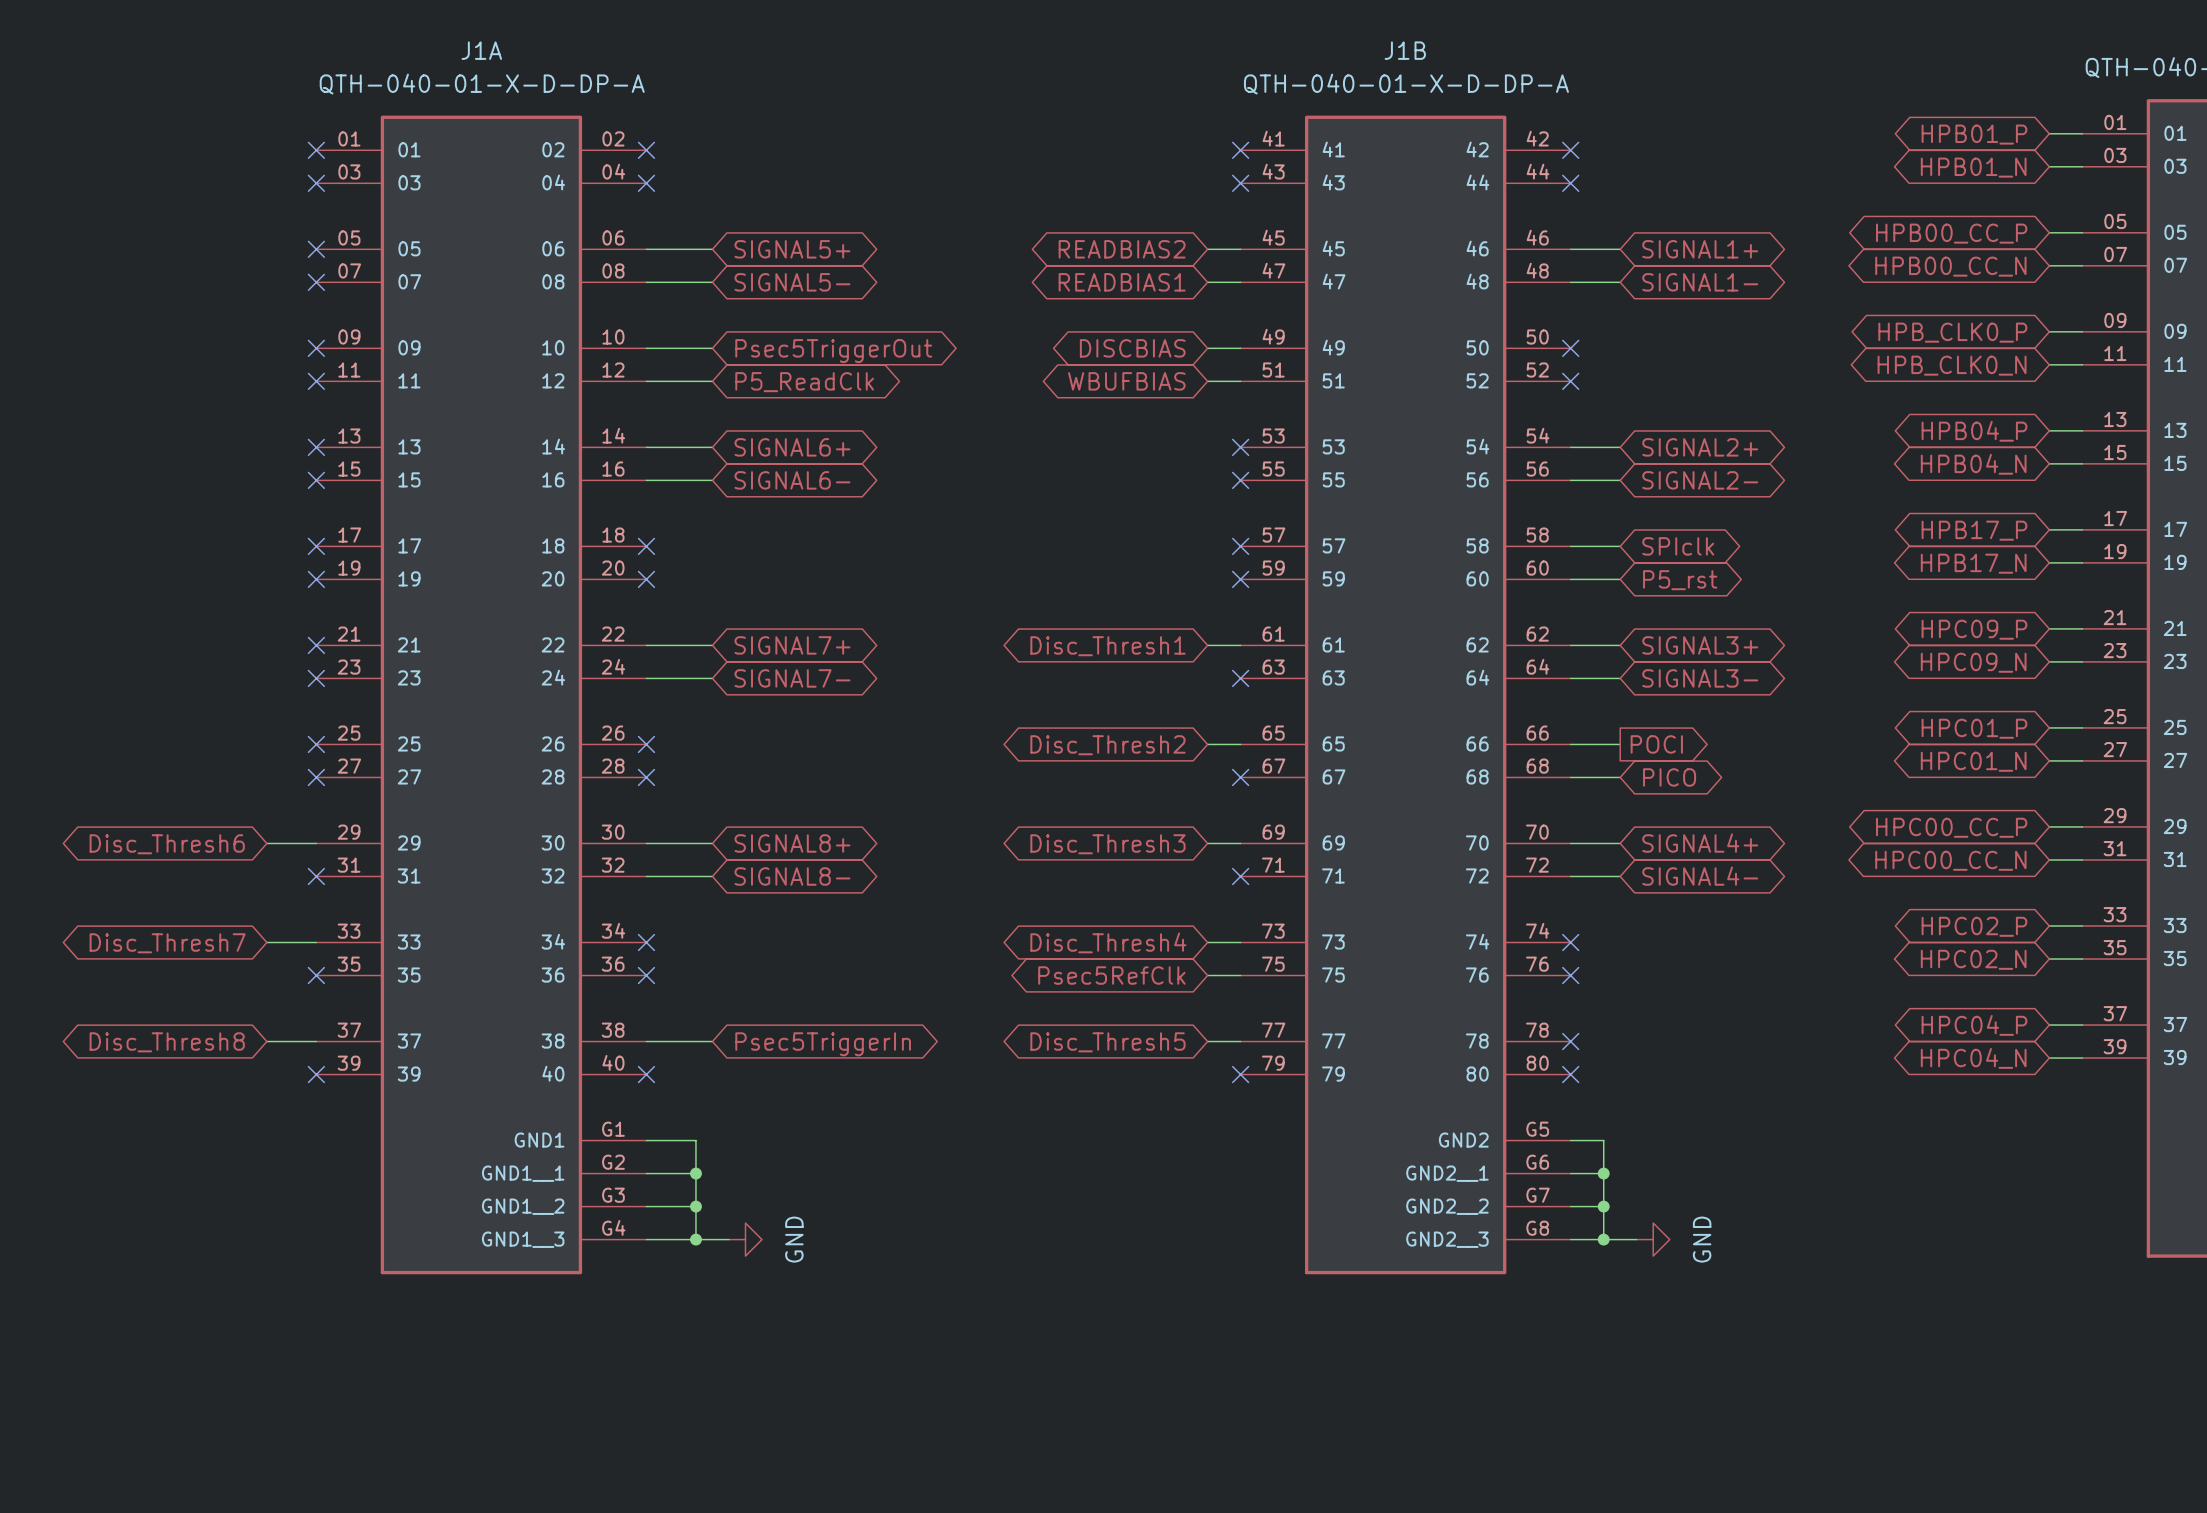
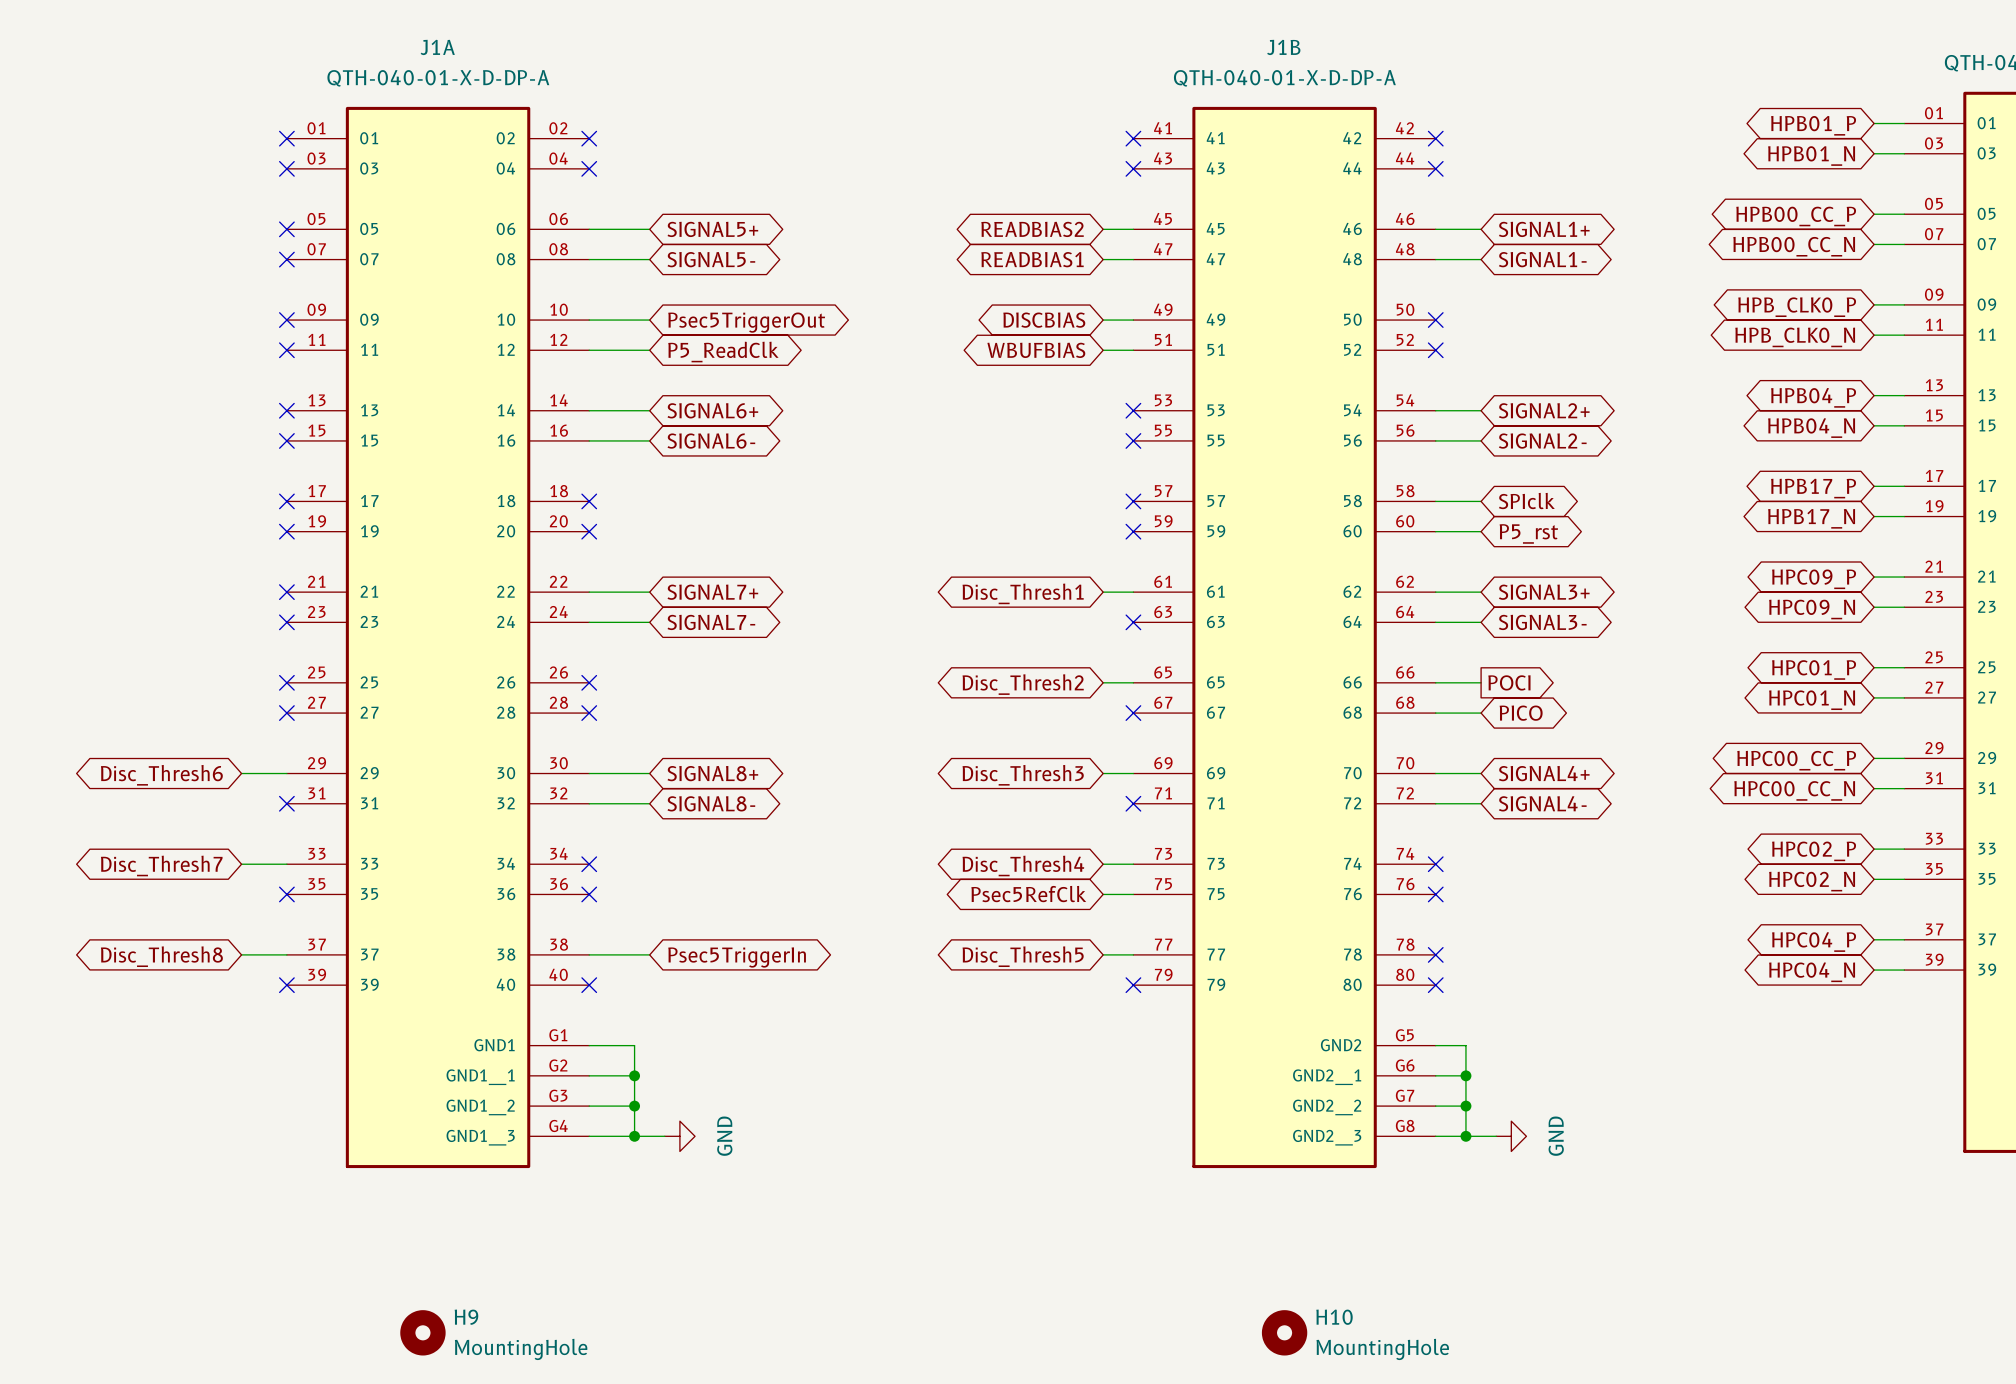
H9: none -> MountingHole (422, 1332)
H10: none -> MountingHole (1284, 1332)

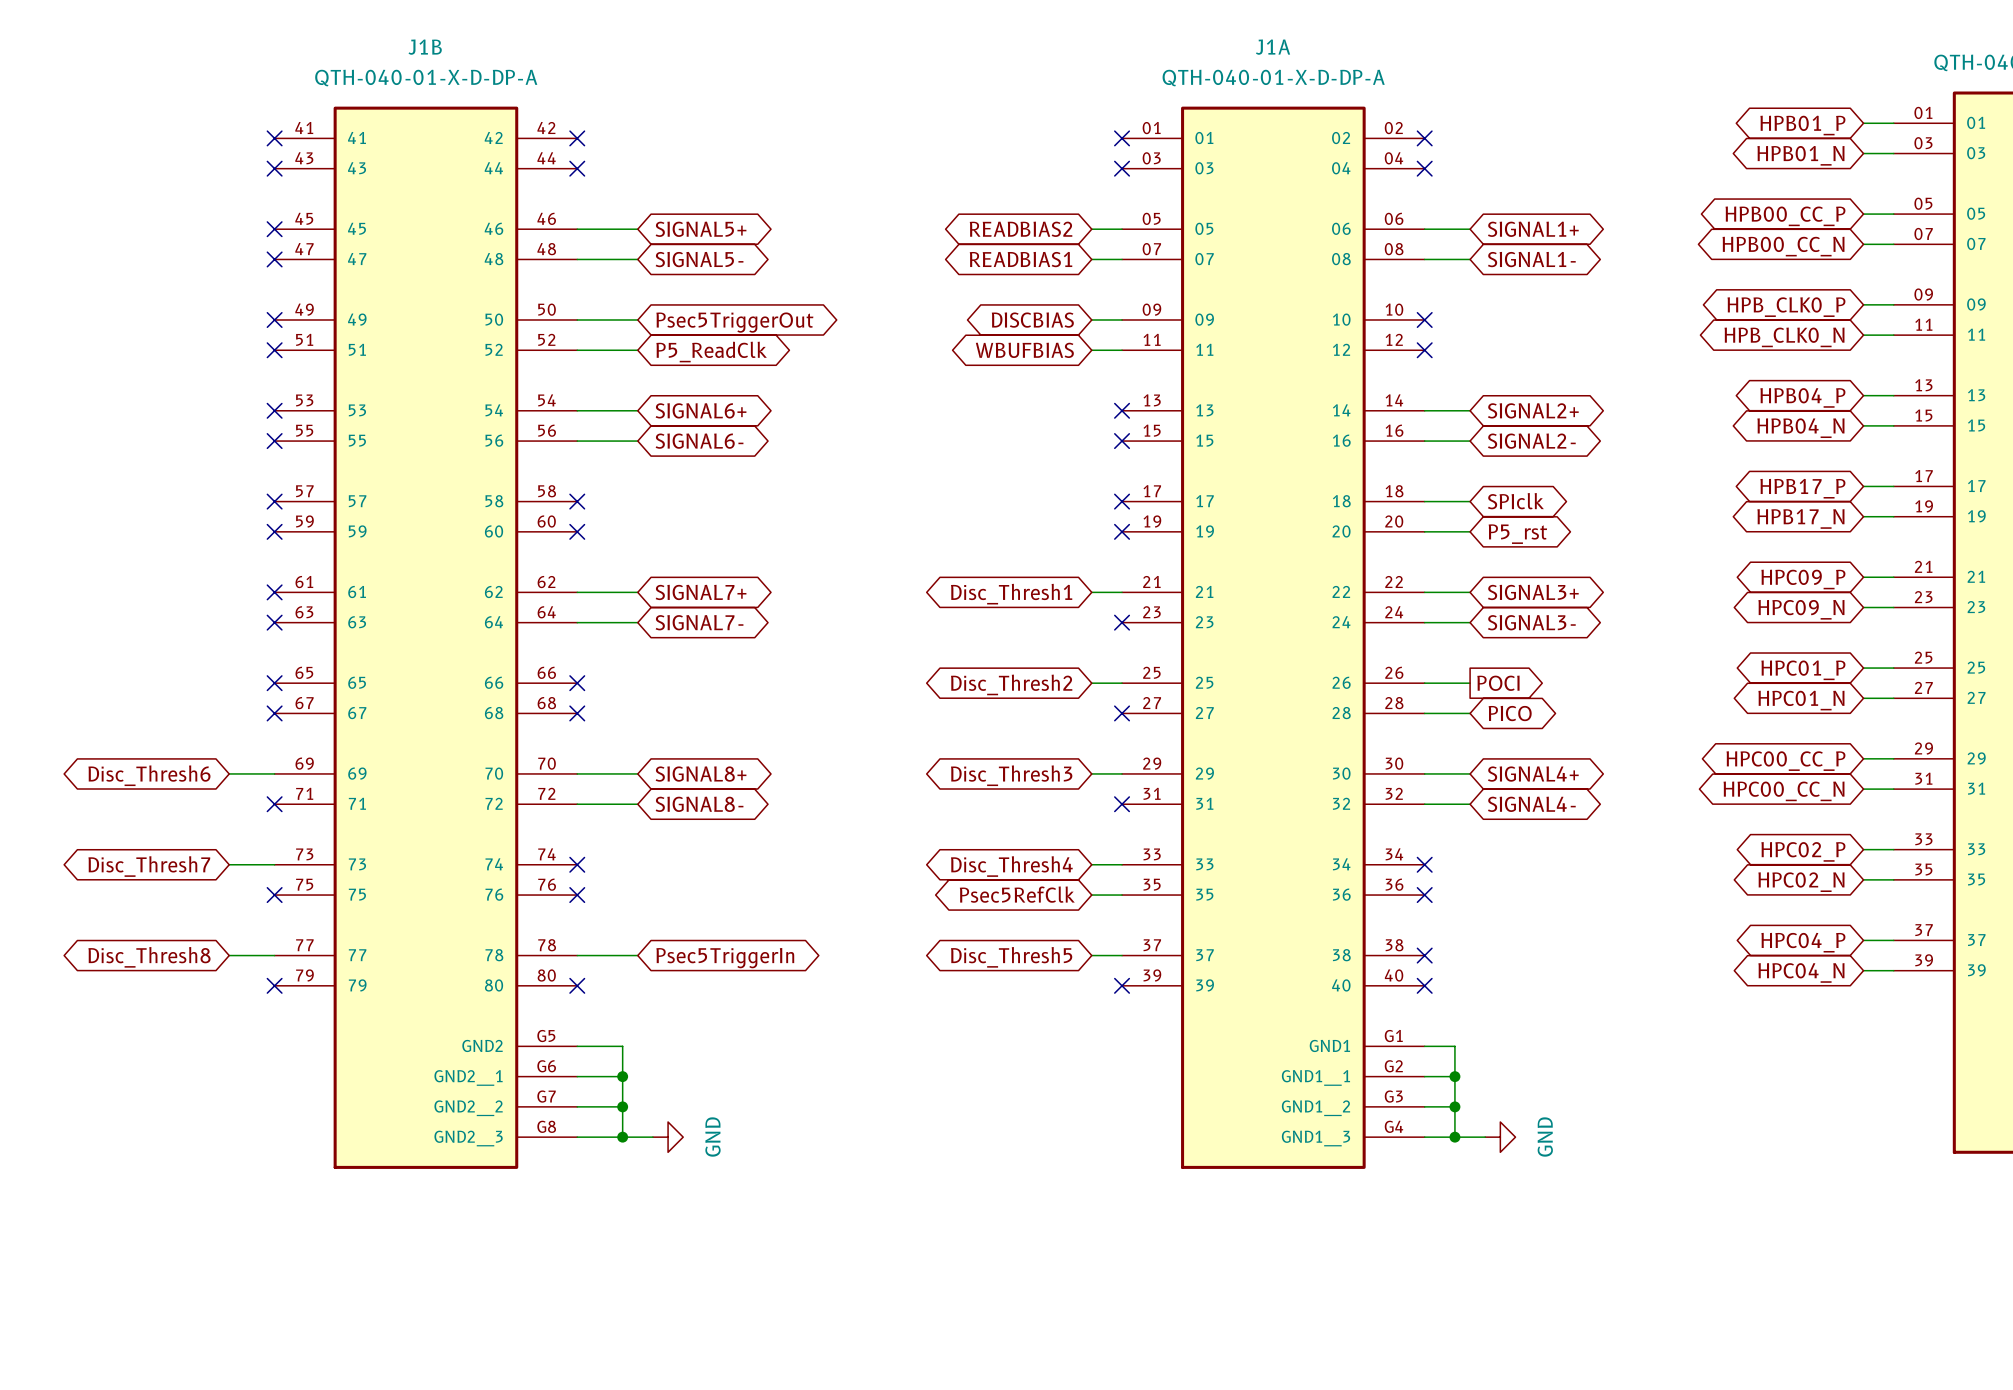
J1A position: (438, 637) -> (1273, 637)
J1B position: (1284, 637) -> (425, 637)
H9: MountingHole (422, 1332) -> none
H10: MountingHole (1284, 1332) -> none

